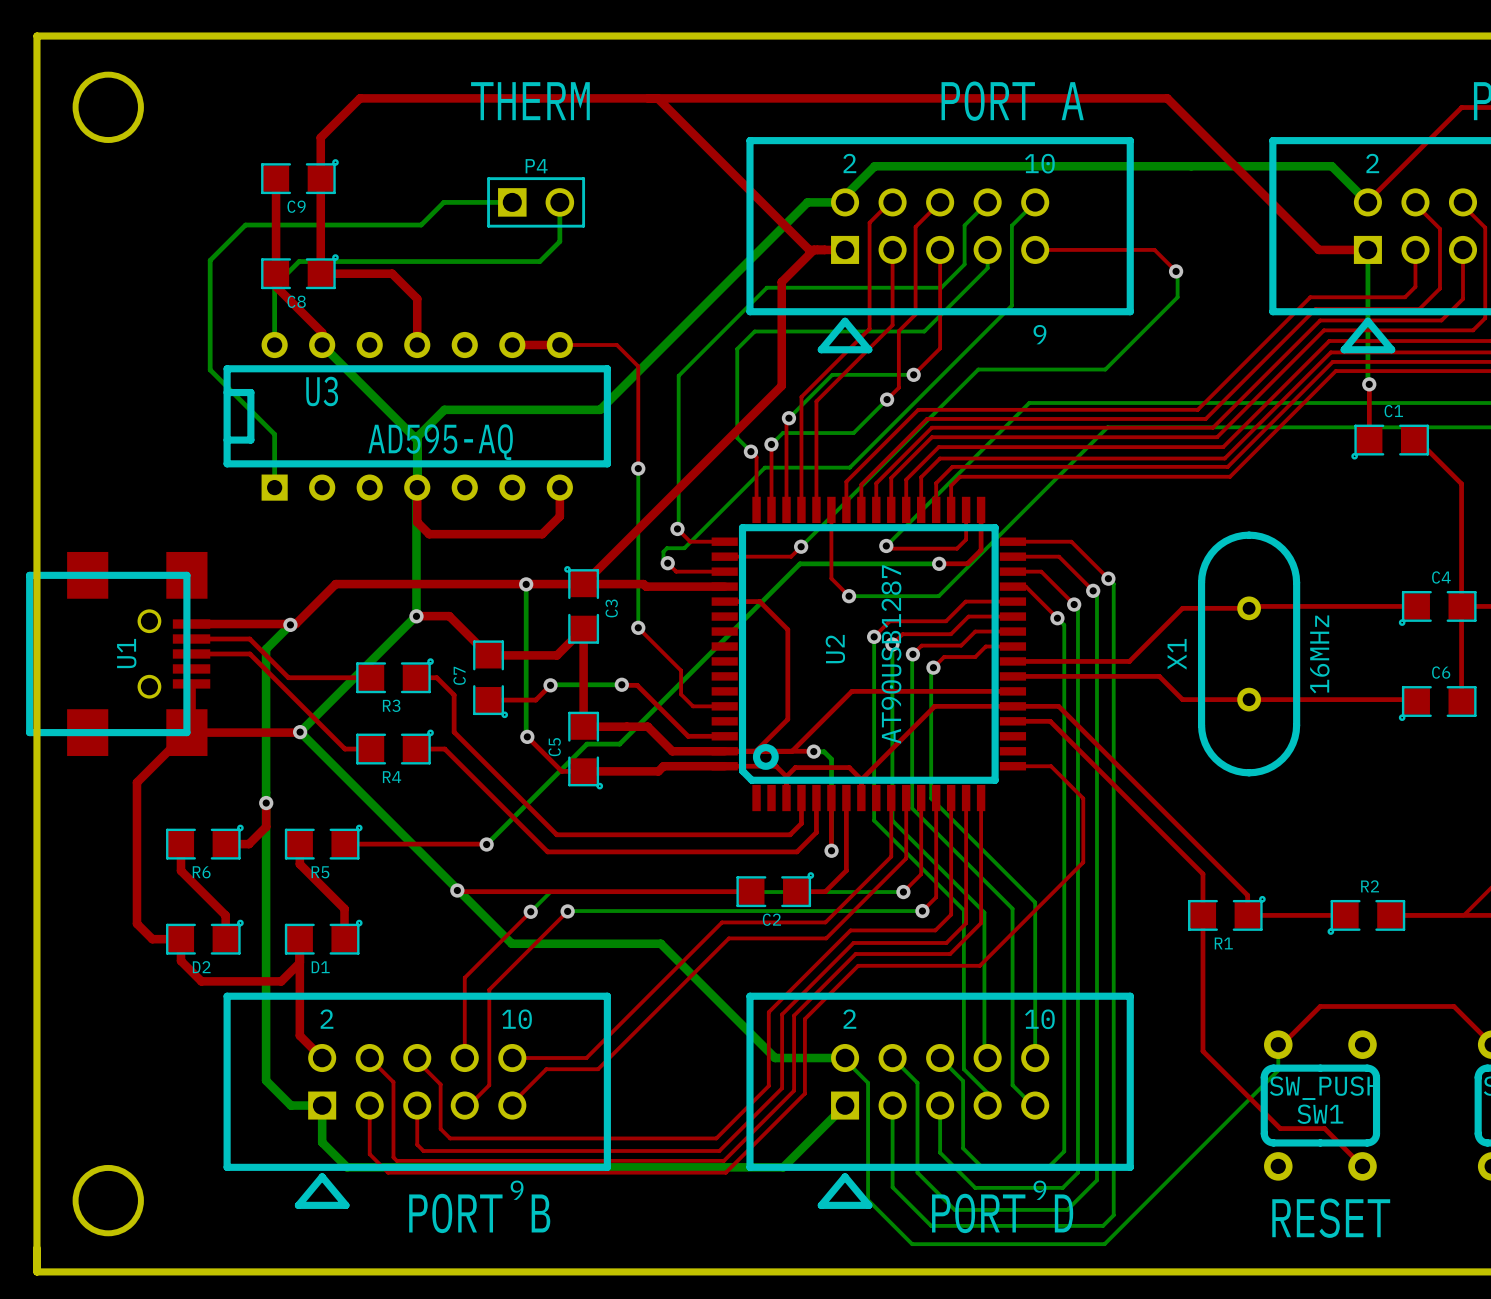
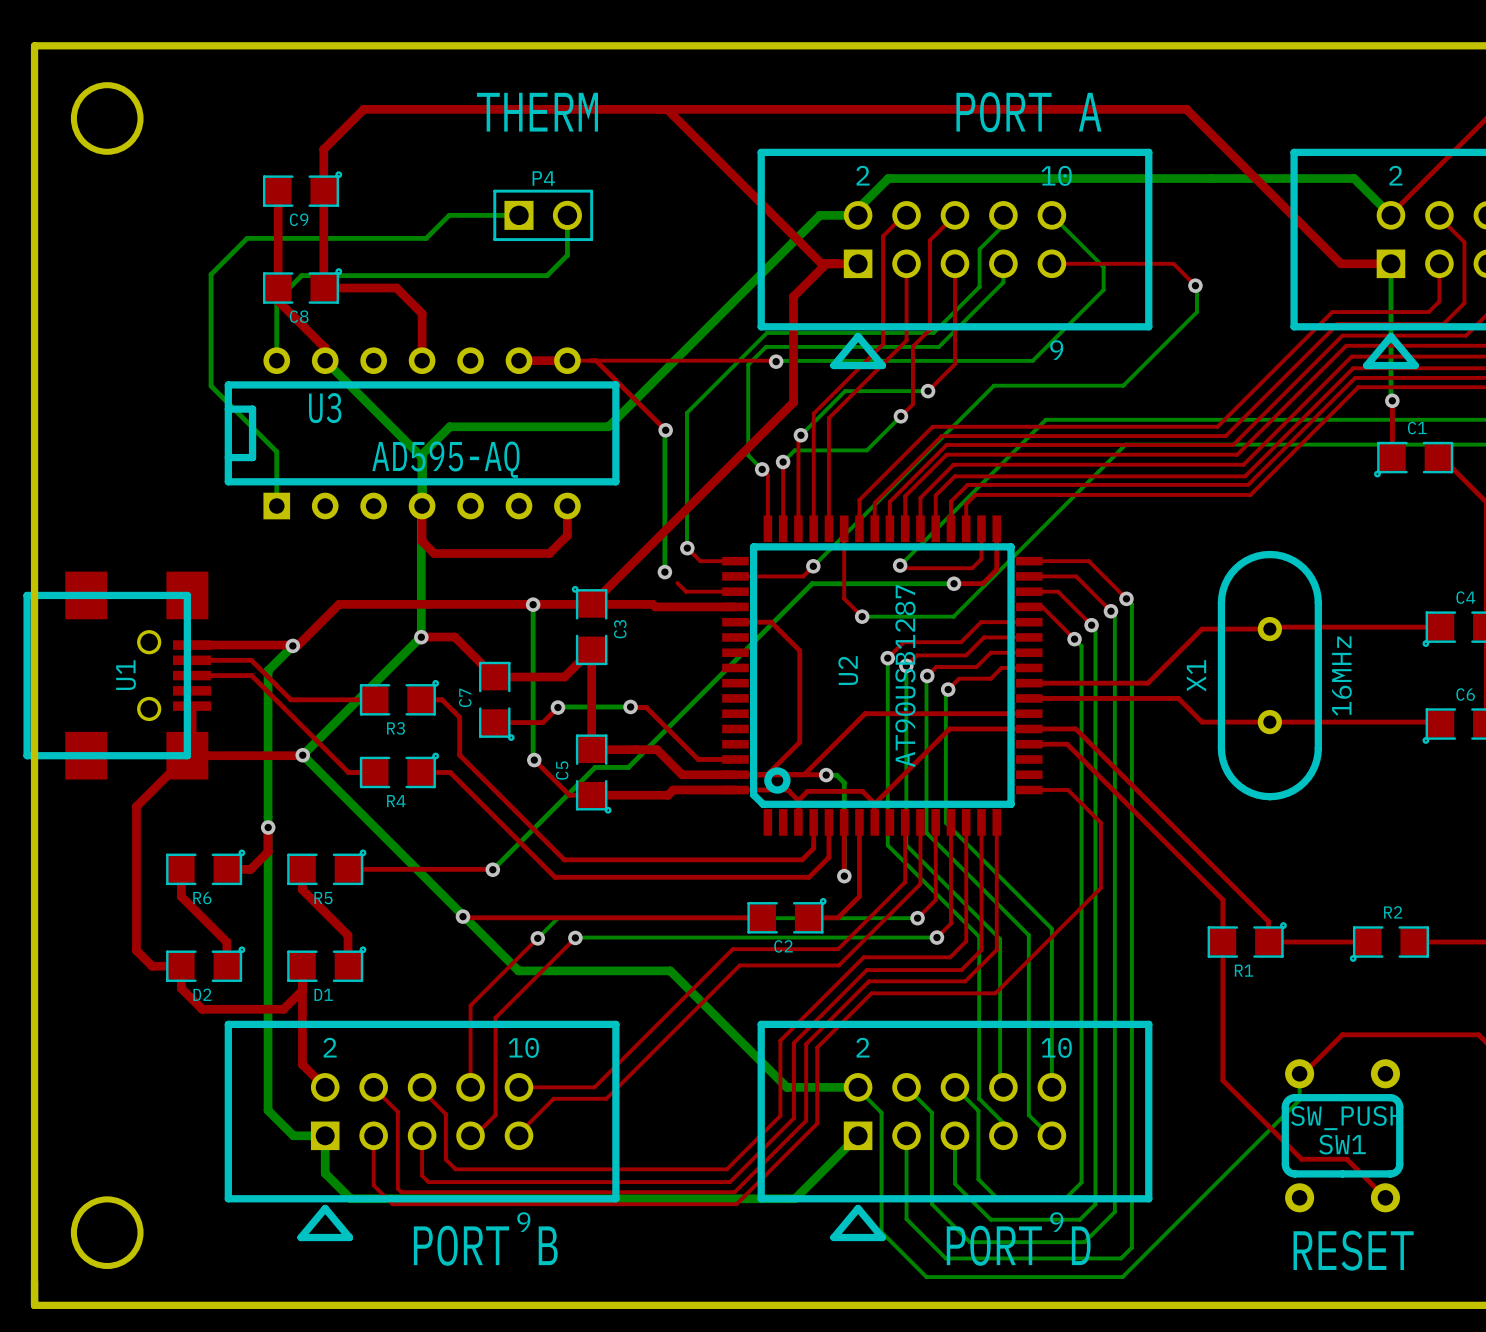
bottom track: (987, 202) (964, 225) (964, 264) (941, 287) (766, 287) (678, 375) (677, 528) -> (1003, 215) (1003, 225) (979, 249) (979, 286) (933, 332) (766, 332) (686, 412) (686, 546)
bottom track: (1035, 202) (1011, 225) (1011, 305) (849, 467) (764, 467) (684, 548) (667, 548) (663, 551) (663, 558) (667, 563) -> (1051, 215) (1103, 267) (1103, 289) (1032, 360) (776, 361)
top track: none -> (590, 360) (596, 360) (665, 430)
top track: (616, 345) (638, 366) (638, 468) -> (625, 360) (776, 361)
via: none -> (776, 361)
bottom track: none -> (665, 430) (664, 572)
via: none -> (665, 430)
bottom track: (638, 468) (638, 627) -> none
via: (638, 468) -> none
via position: (667, 563) -> (664, 572)
top track: (638, 627) (681, 670) (681, 694) (693, 706) (724, 706) -> none
via: (638, 627) -> none

